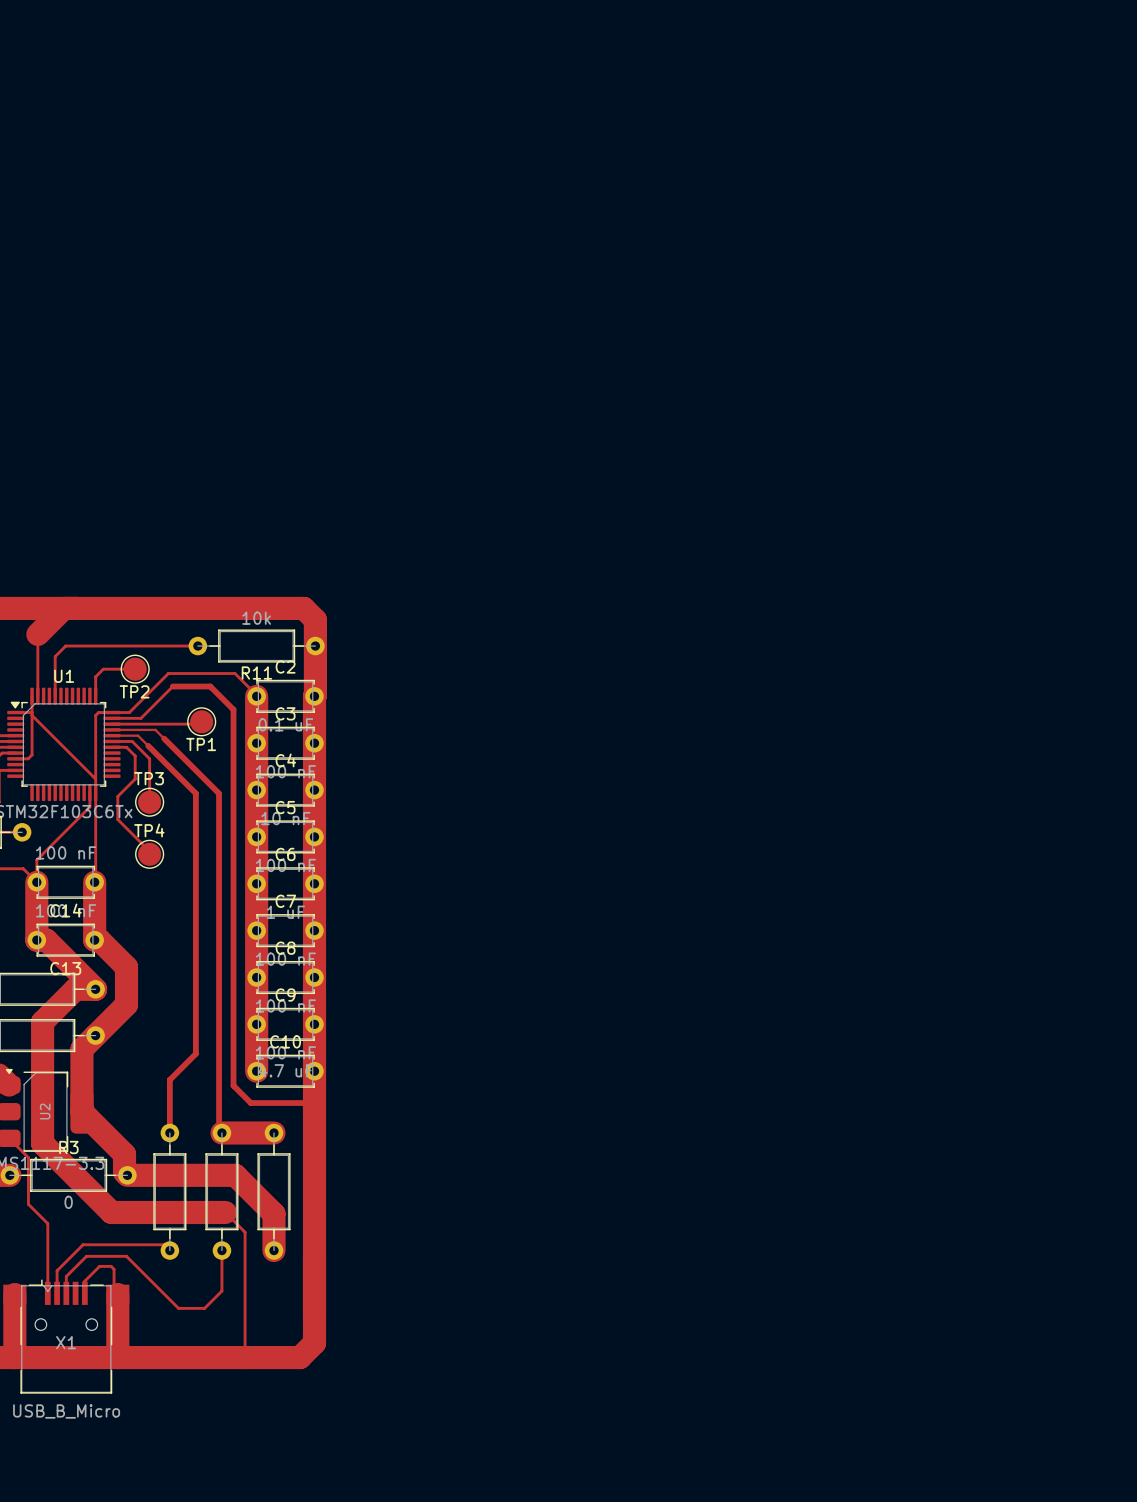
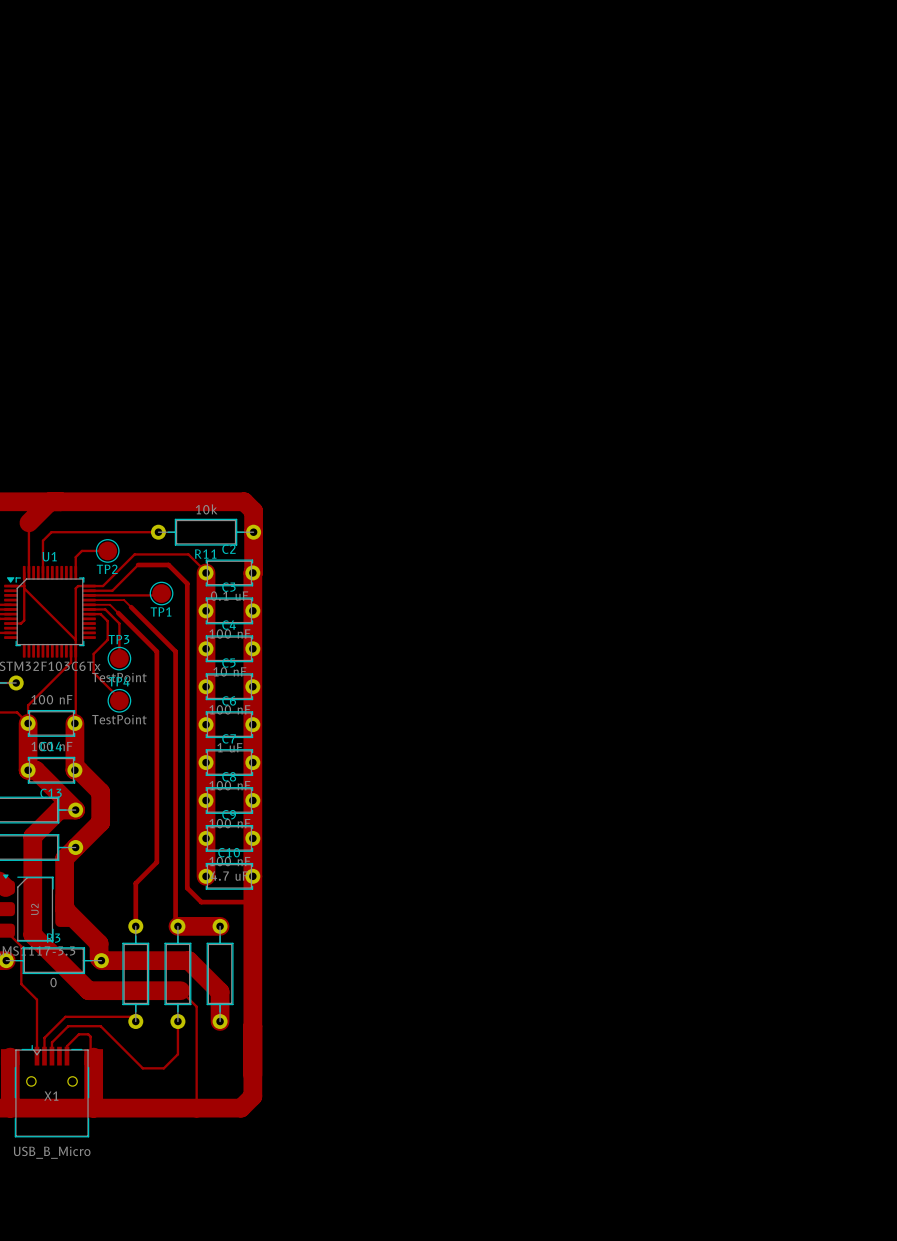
TP3 value: none -> TestPoint (119, 677)
TP4 value: none -> TestPoint (119, 719)

